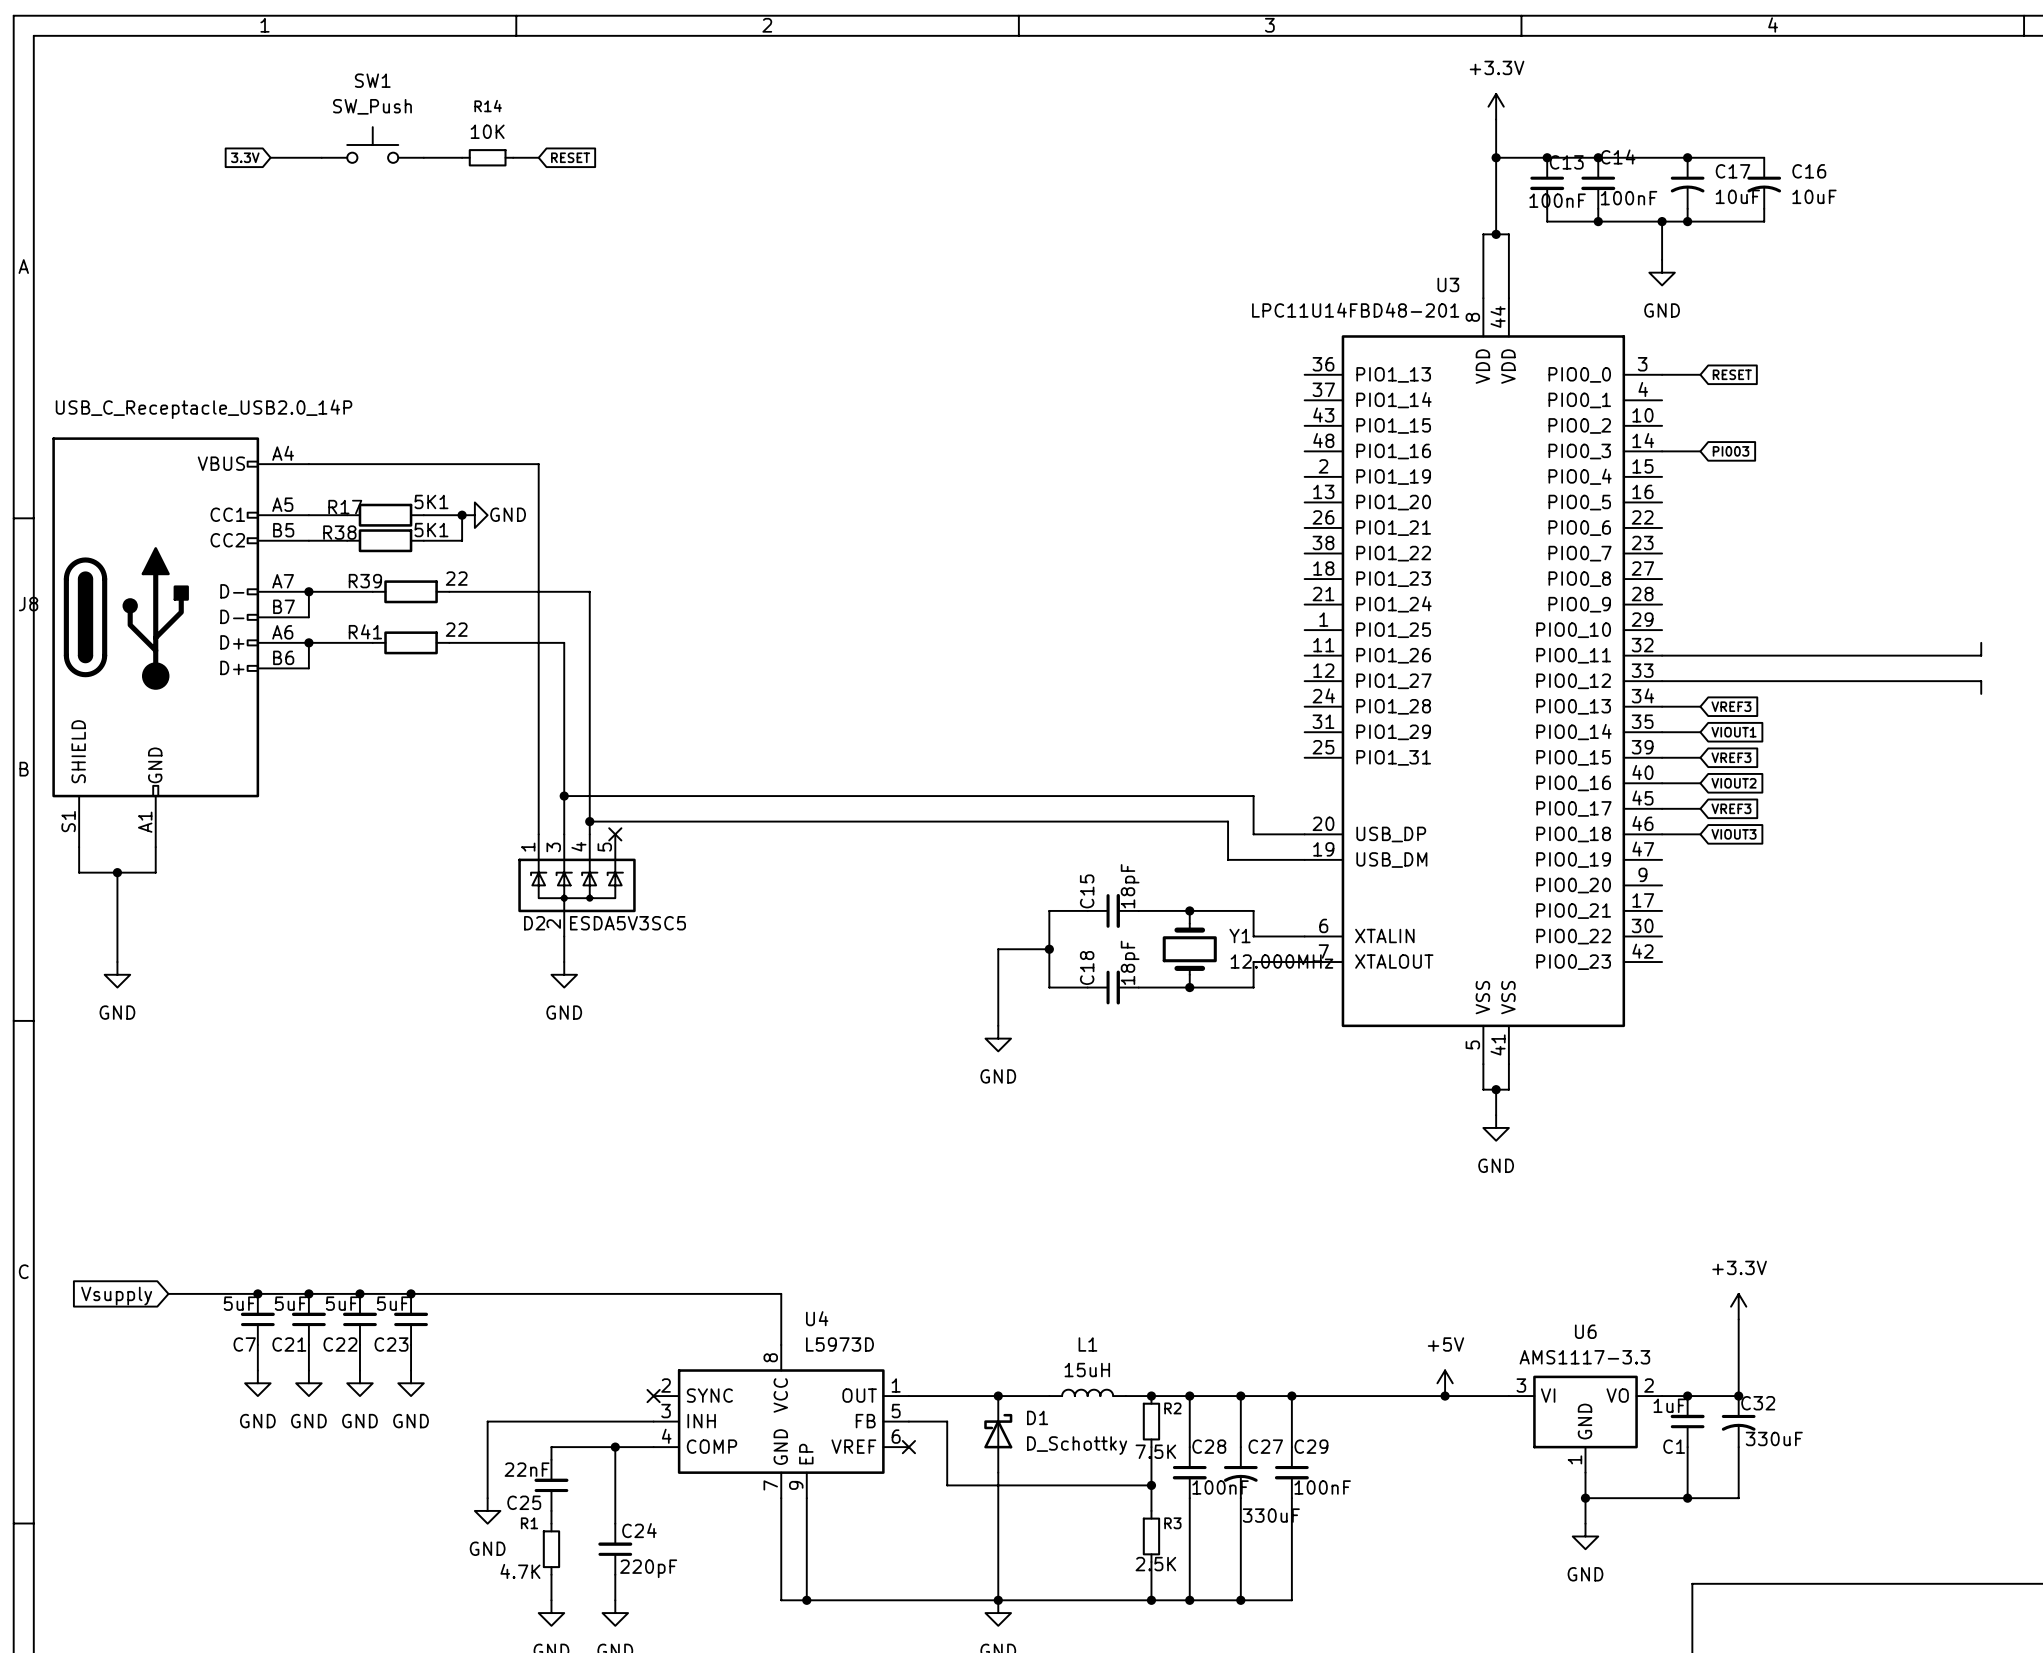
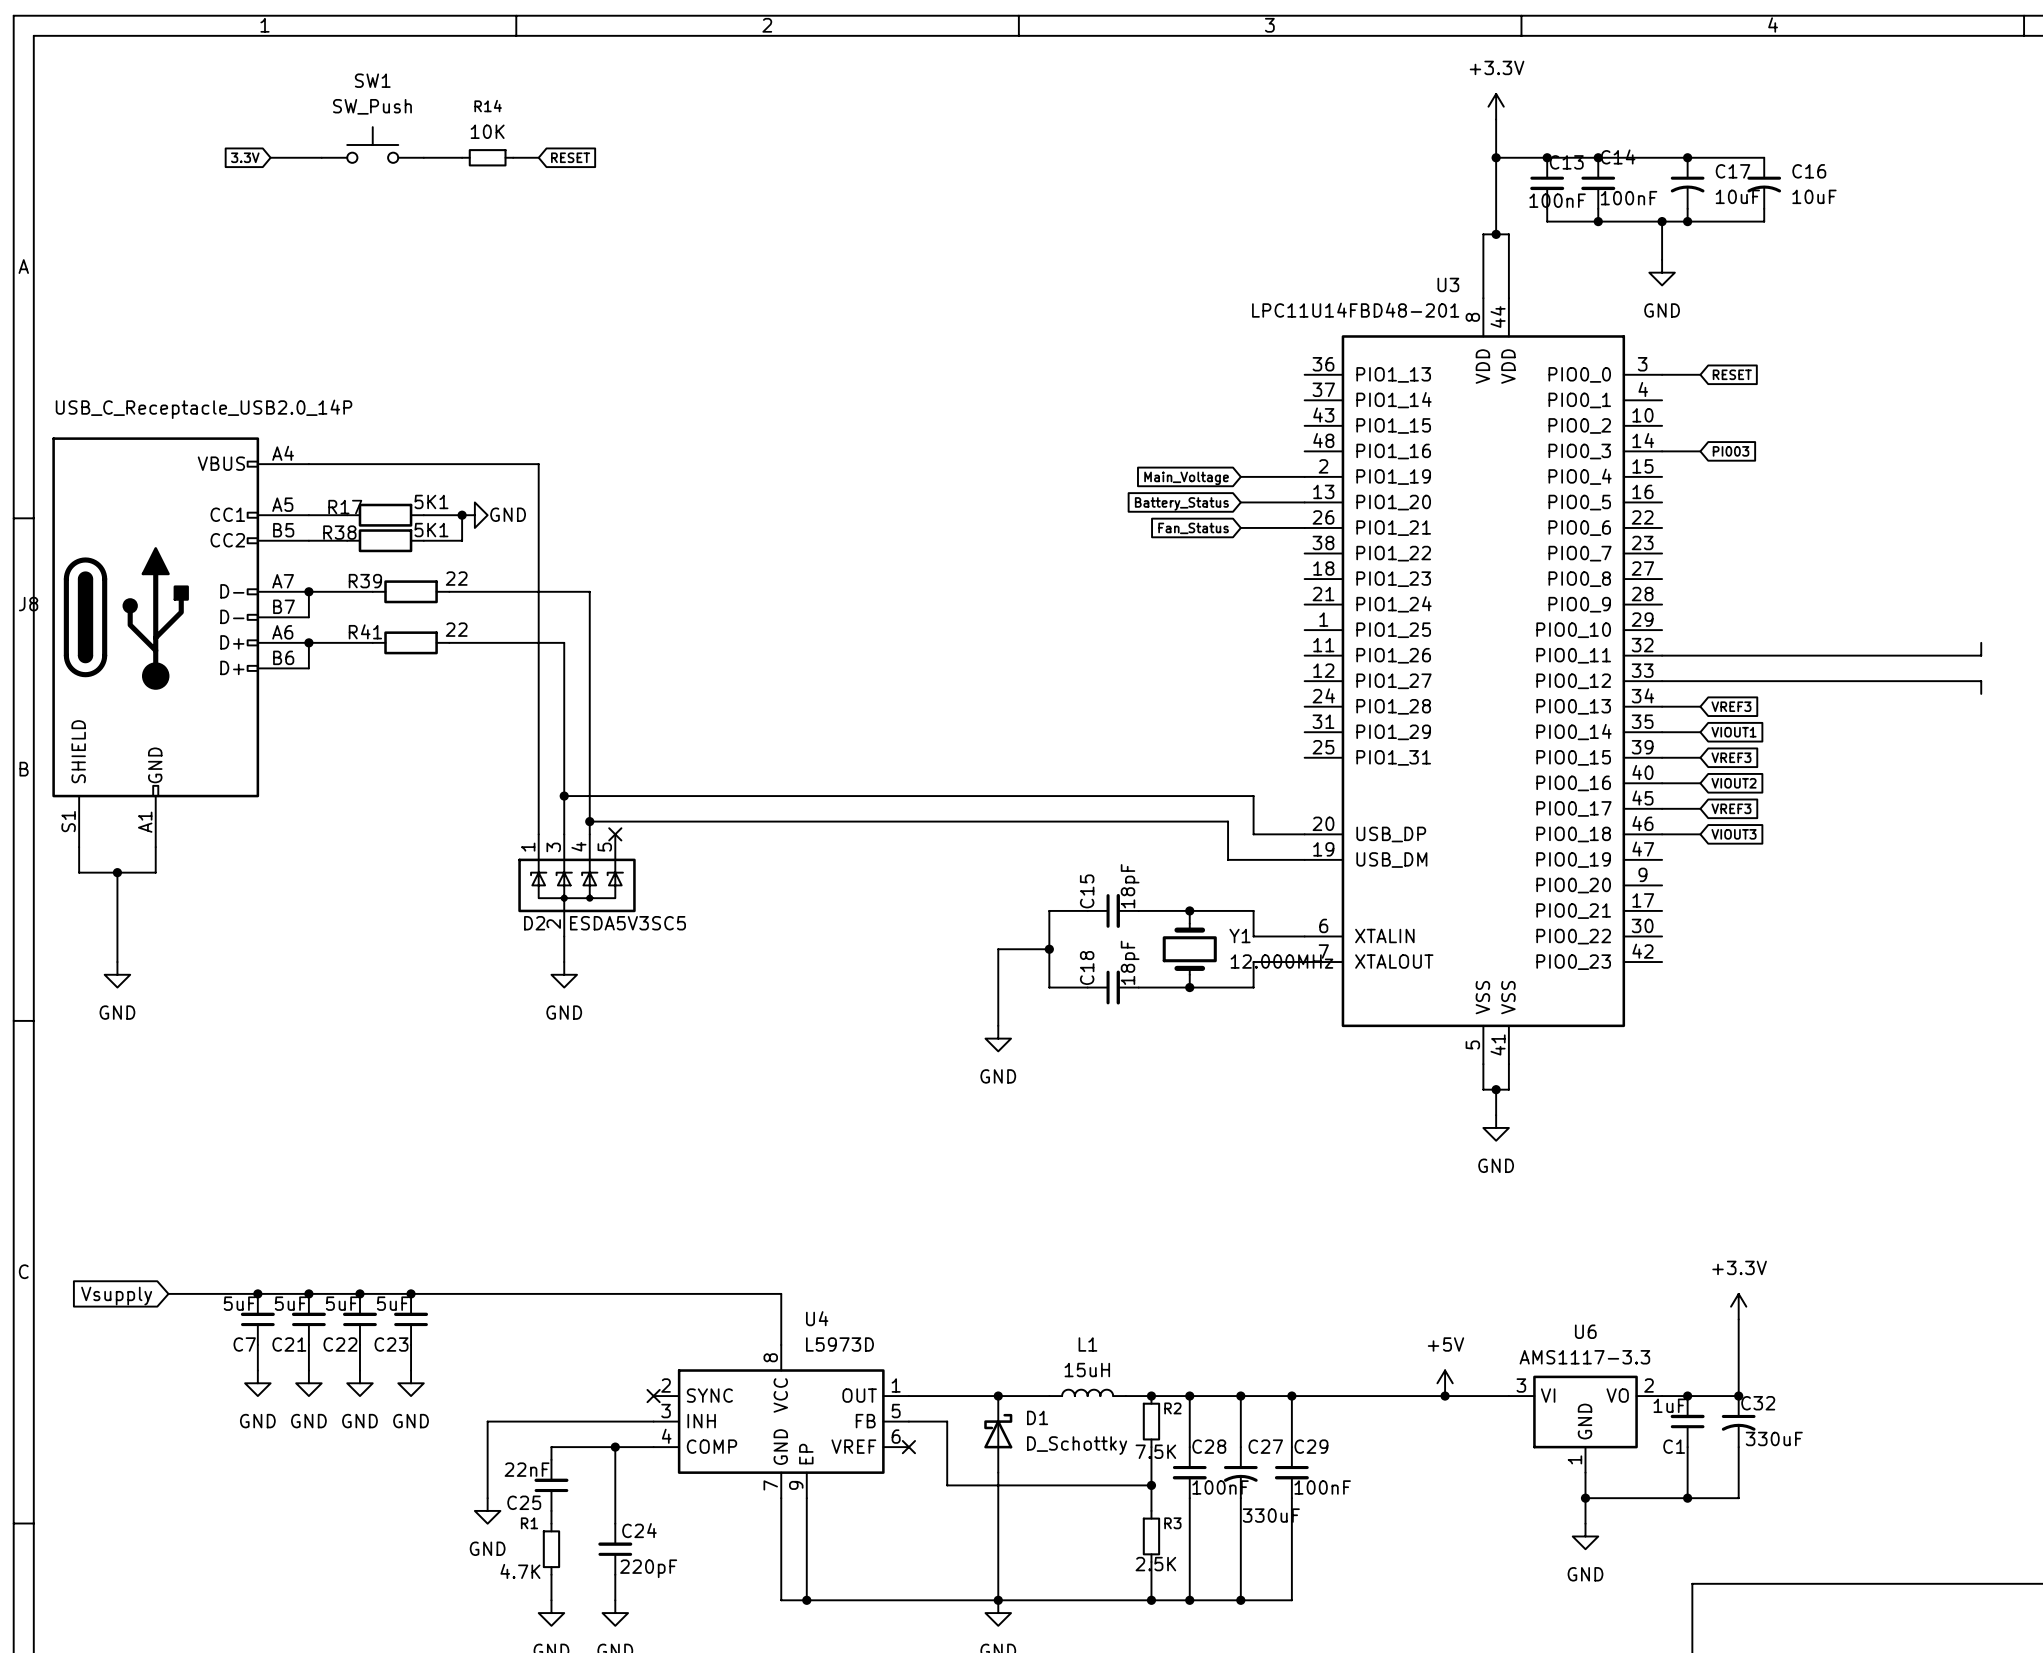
wire: none -> (1240, 476) (1304, 476)
global label: none -> Main_Voltage (1186, 478)
wire: none -> (1240, 502) (1304, 502)
global label: none -> Battery_Status (1181, 503)
wire: none -> (1240, 527) (1304, 527)
global label: none -> Fan_Status (1193, 528)

